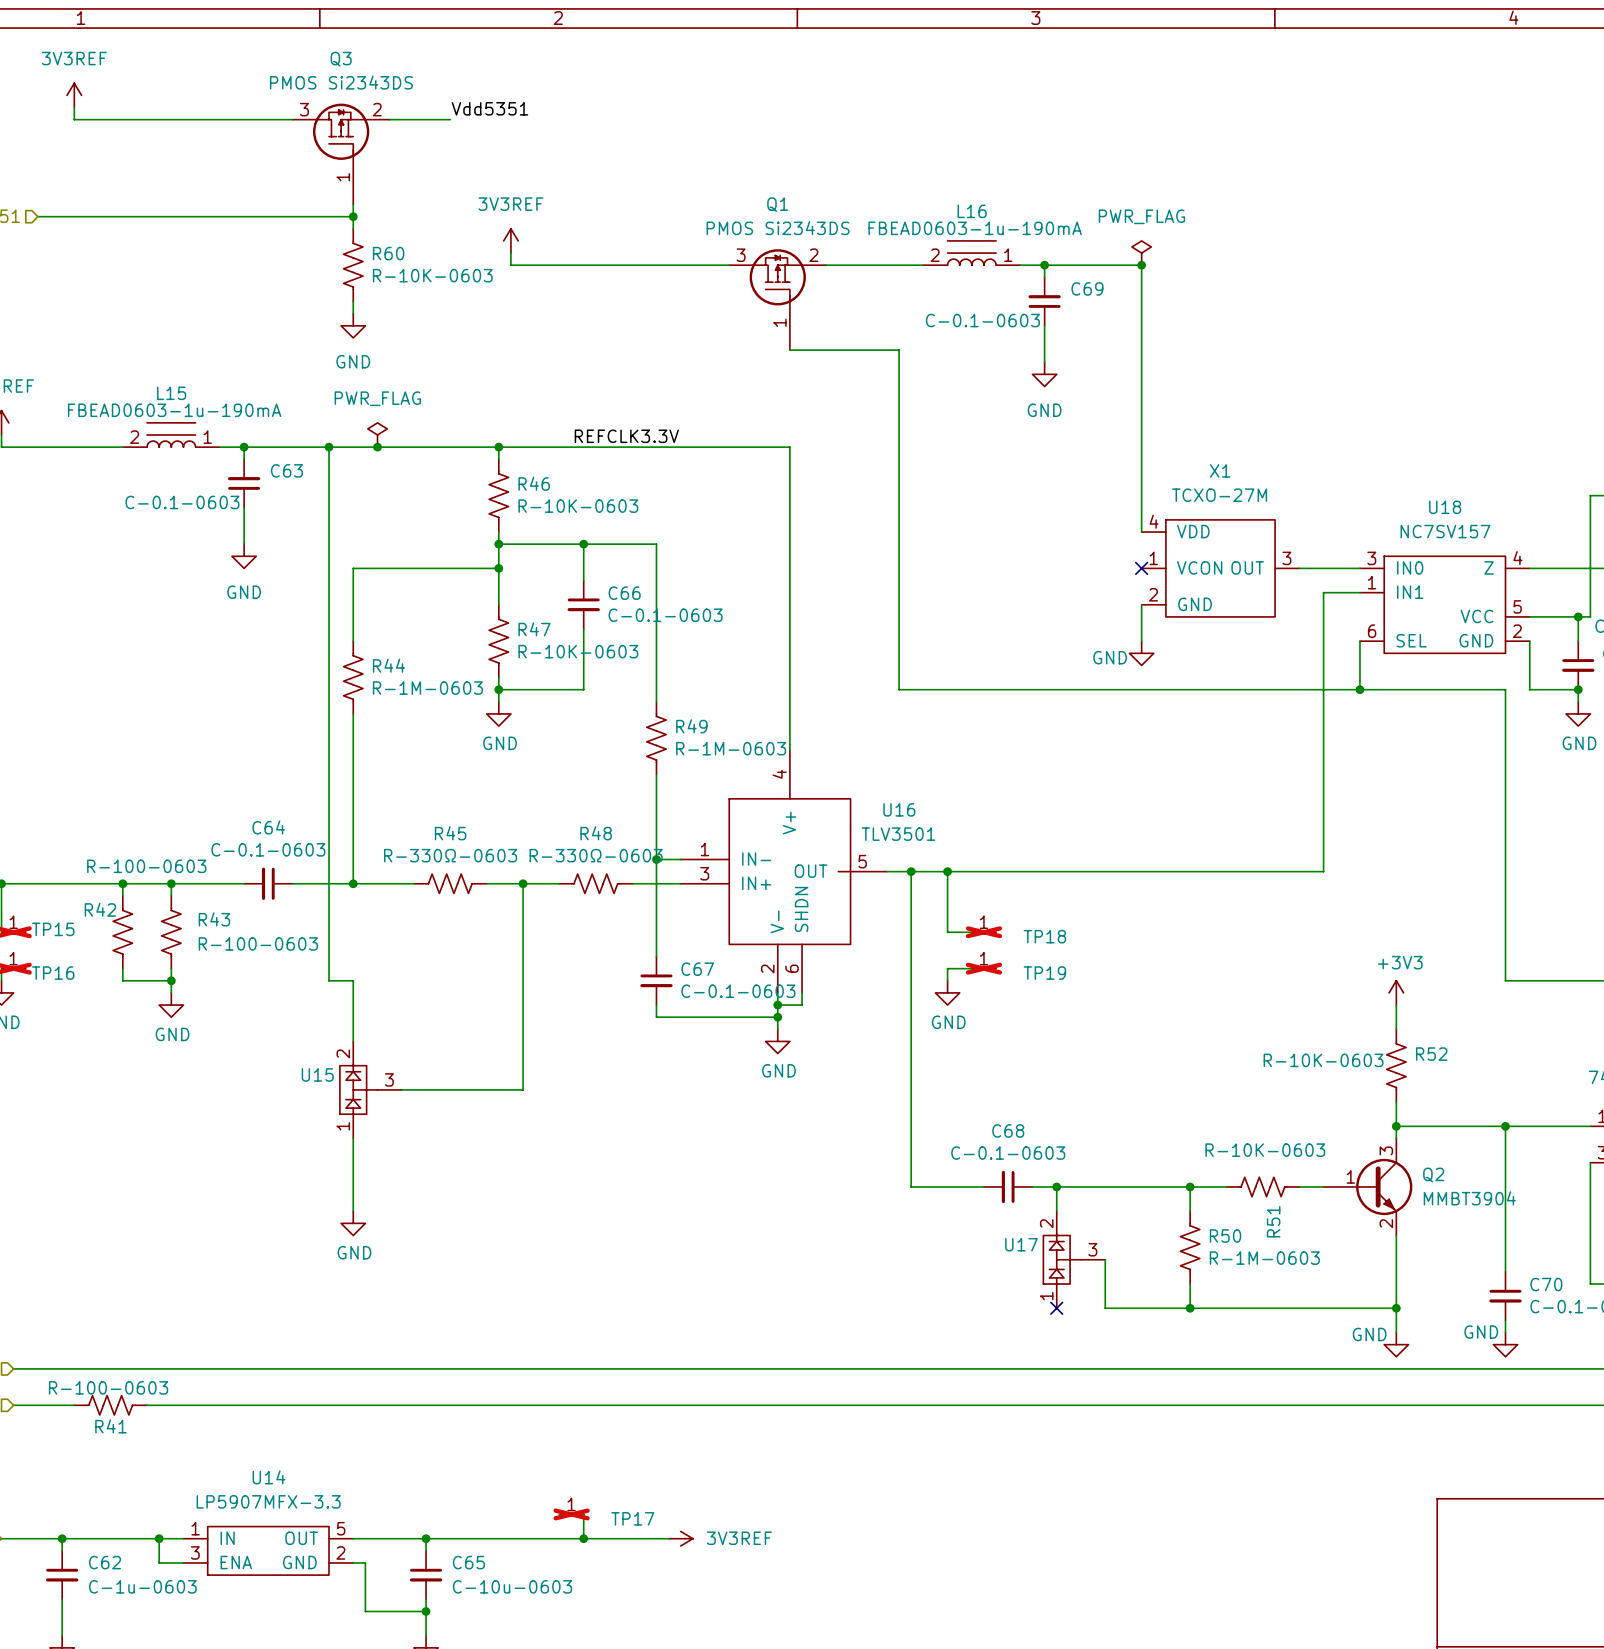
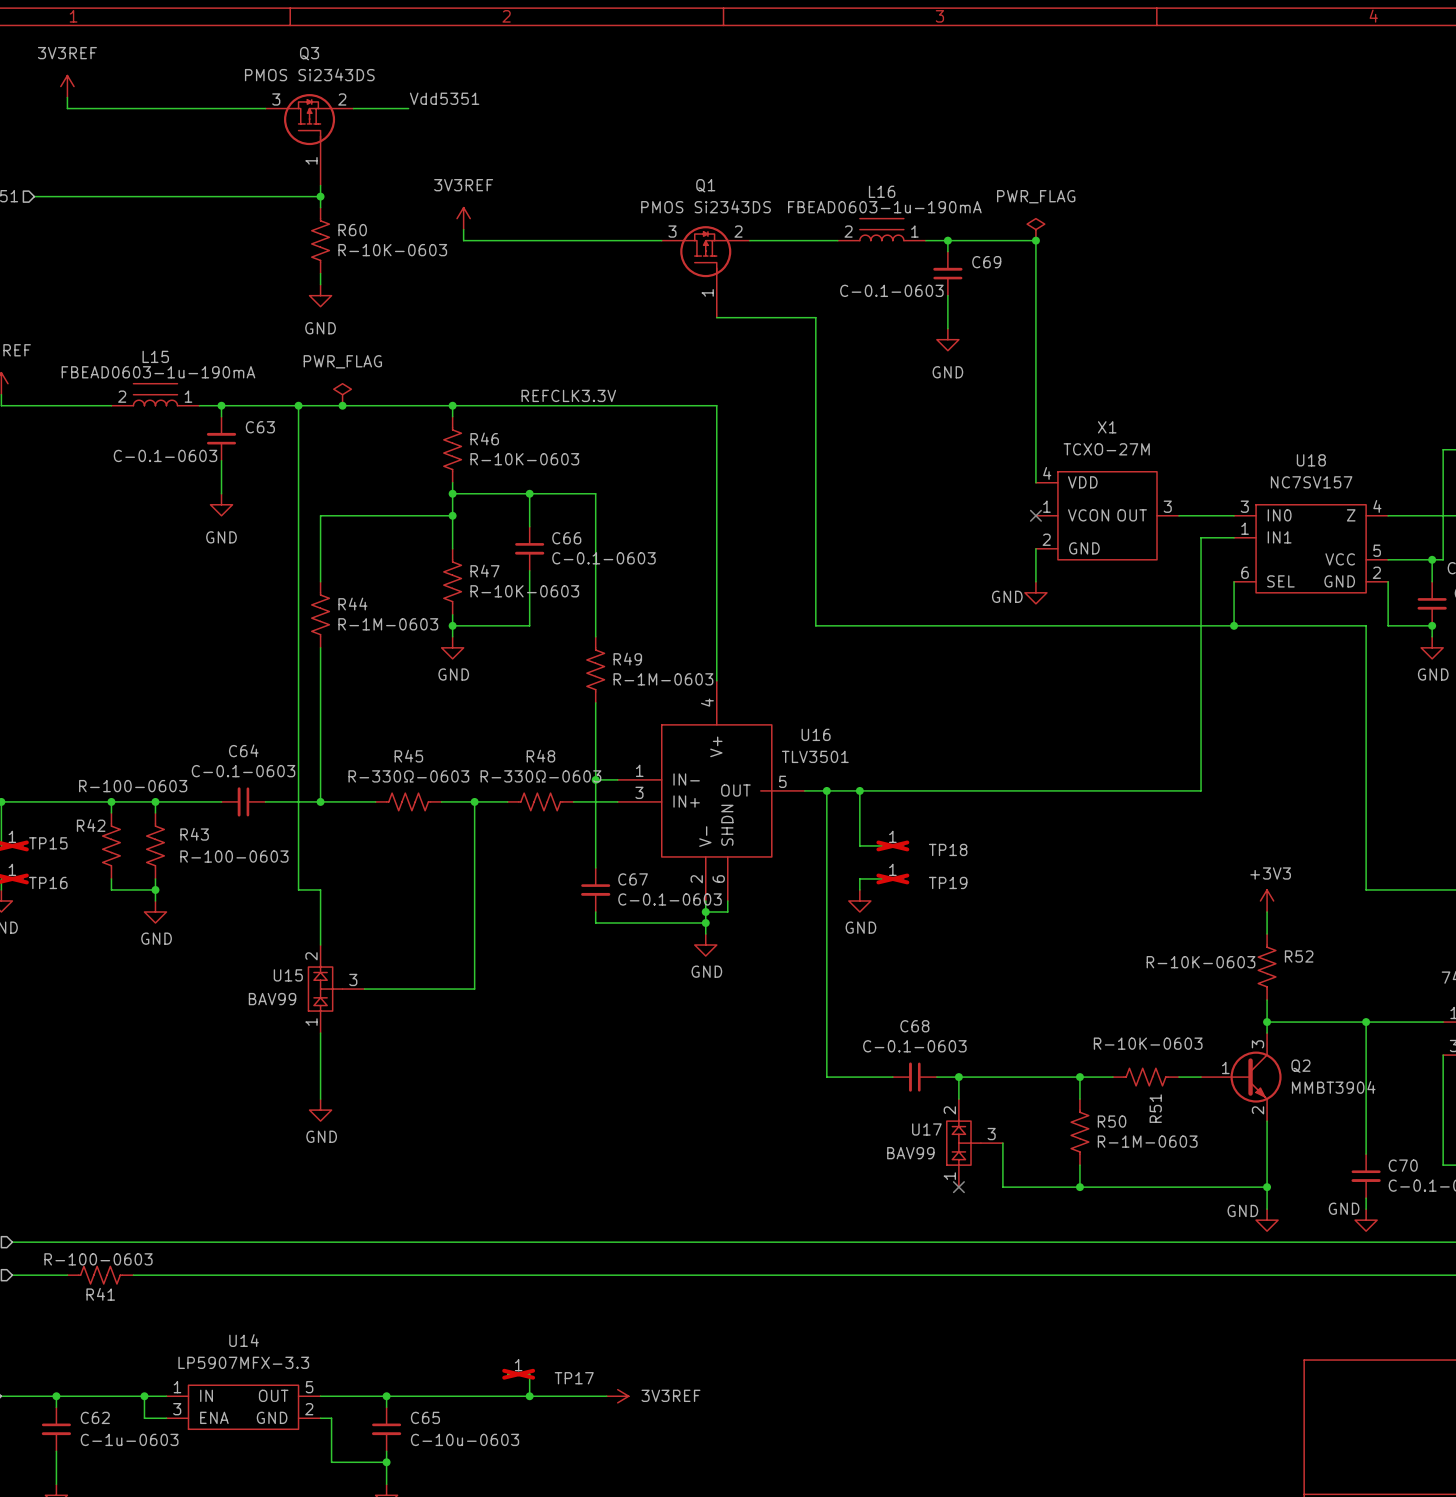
U15 value: none -> BAV99 (272, 999)
U17 value: none -> BAV99 (910, 1153)

